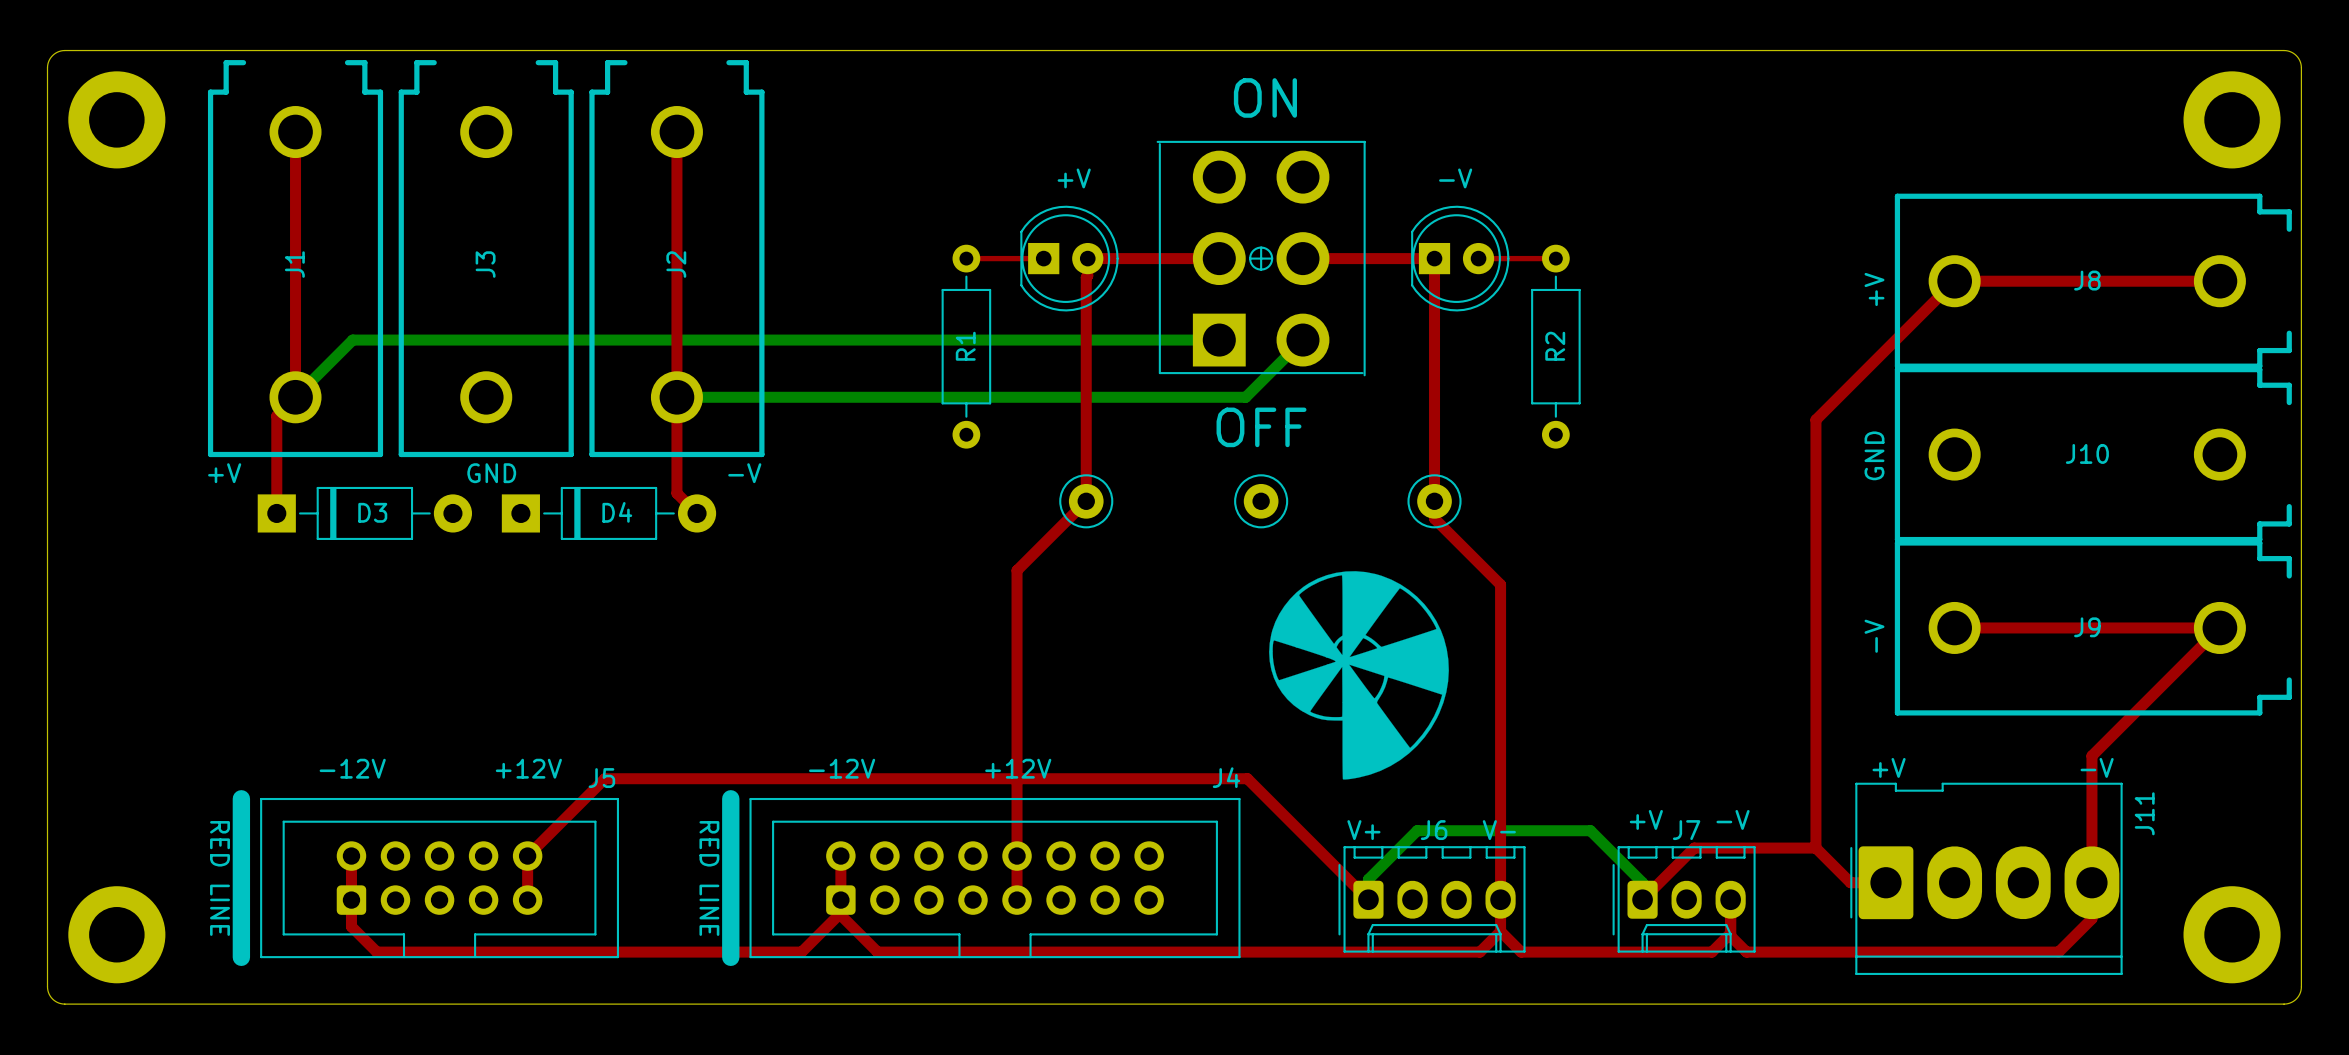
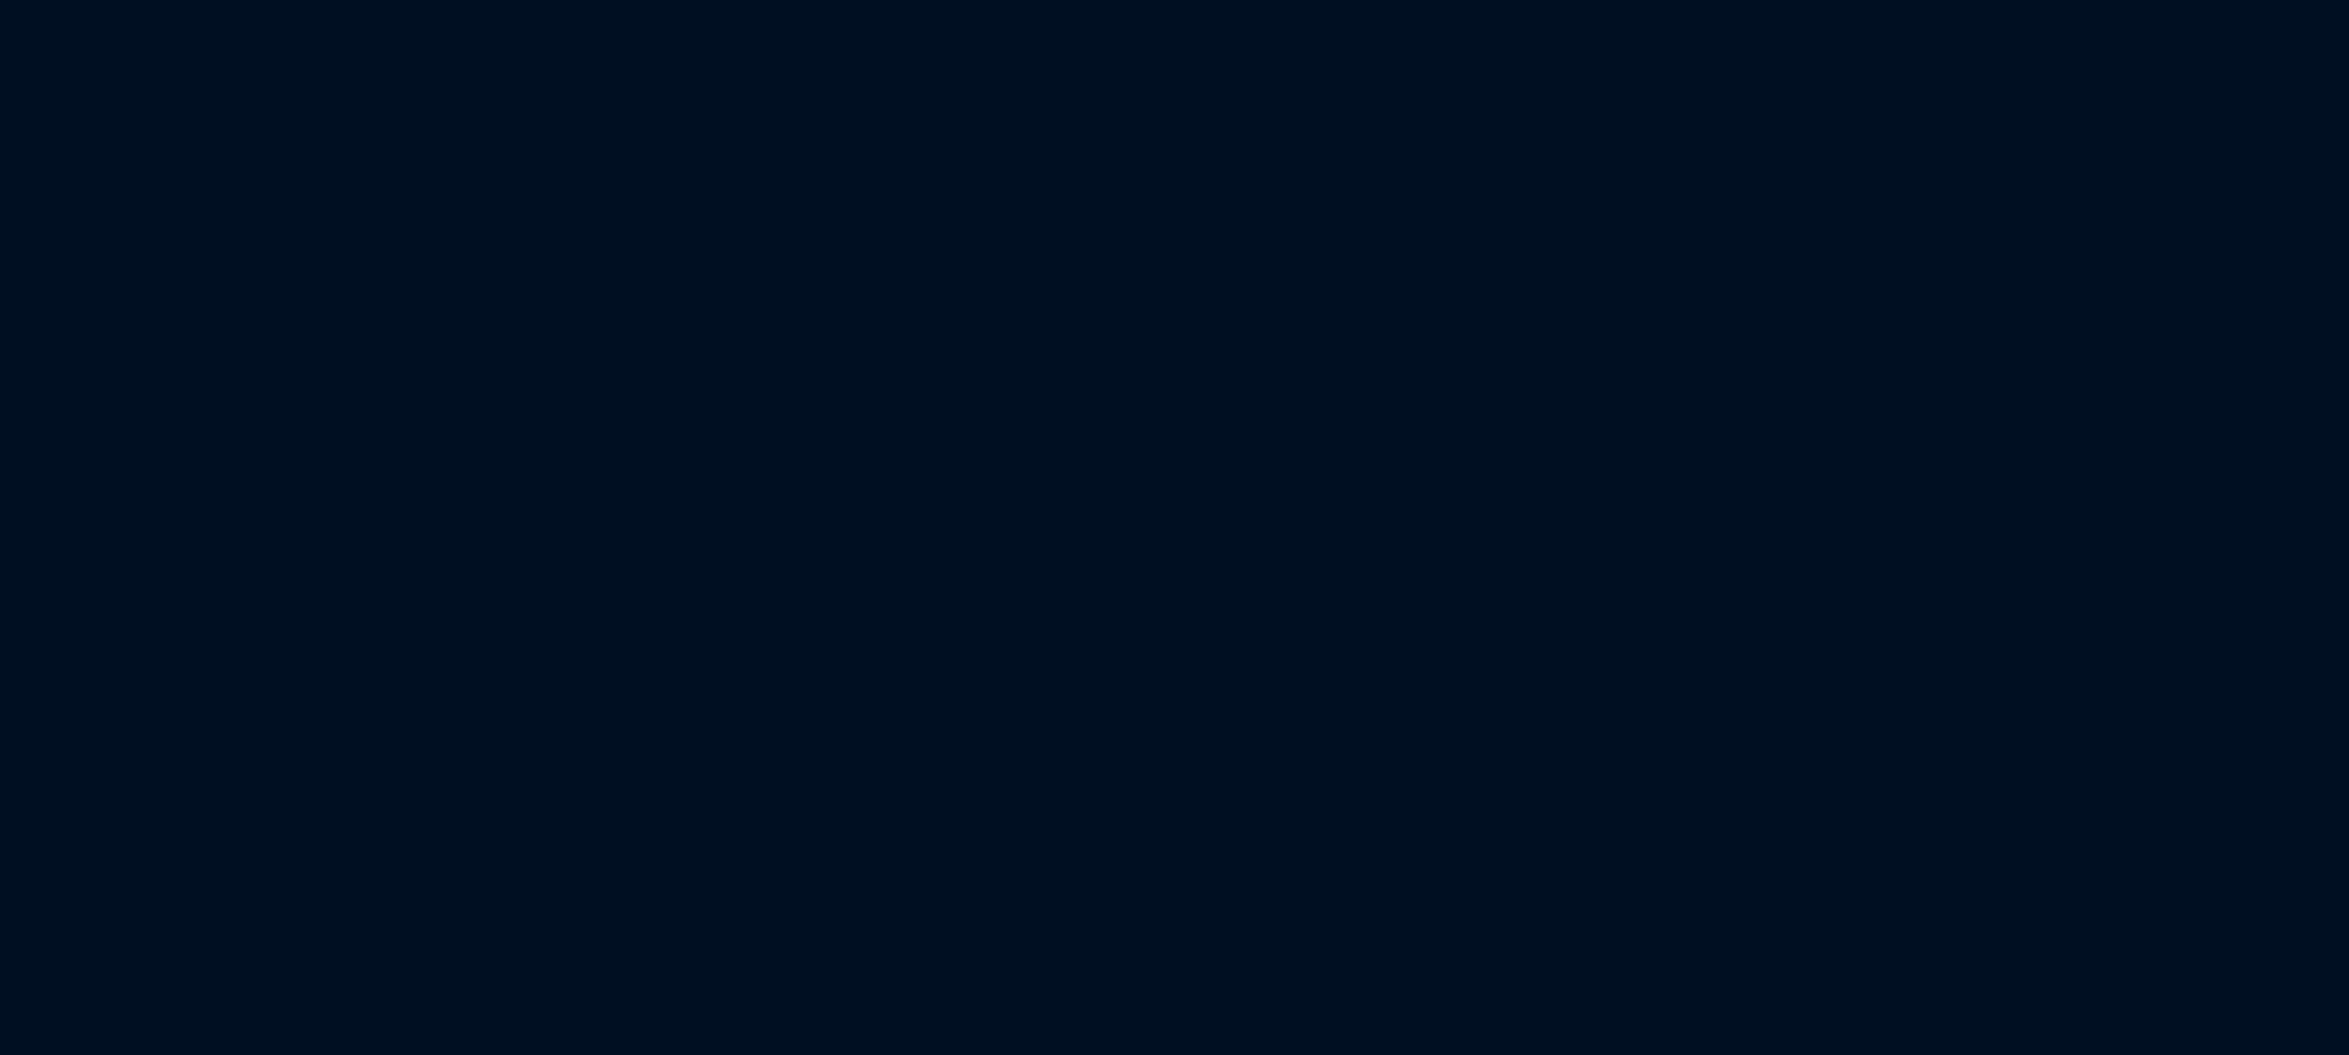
board edge: (64, 50) (2284, 50) (2291, 52) (2298, 58) (2301, 67) (2301, 986) (2299, 994) (2293, 1001) (2284, 1004) (64, 1004) (57, 1002) (50, 995) (47, 986) (47, 67) (52, 55) (64, 50) -> none
text: ON (1265, 97) -> none
part: (116, 119) -> none
part: (2232, 119) -> none
top track: (295, 132) (295, 397) (276, 416) (276, 513) -> none
top track: (676, 132) (676, 493) (697, 513) -> none
text: +V (1074, 178) -> none
text: -V (1455, 178) -> none
J1: (295, 258) -> none
J3: (486, 258) -> none
J2: (676, 258) -> none
top track: (966, 258) (1043, 258) -> none
part: (1069, 258) -> none
top track: (1219, 258) (1087, 258) (1086, 501) (1017, 570) (1017, 900) -> none
part: (1261, 258) -> none
top track: (1302, 258) (1434, 258) (1434, 518) (1500, 584) (1500, 931) -> none
part: (1460, 258) -> none
top track: (1478, 258) (1555, 258) -> none
J8: (2093, 281) -> none
top track: (2219, 281) (1954, 281) (1815, 419) (1815, 848) -> none
text: +V (1874, 289) -> none
bottom track: (1219, 340) (352, 340) (295, 397) -> none
bottom track: (1302, 340) (1245, 397) (676, 397) -> none
R1: (966, 346) -> none
R2: (1555, 346) -> none
text: OFF (1261, 427) -> none
J10: (2093, 454) -> none
text: GND (1874, 455) -> none
text: +V (224, 473) -> none
text: GND (491, 473) -> none
text: -V (744, 473) -> none
part: (1086, 501) -> none
part: (1261, 501) -> none
part: (1434, 501) -> none
D3: (364, 513) -> none
D4: (608, 513) -> none
drawing: [1269, 571, 1449, 780] -> none
top track: (1954, 627) (2219, 627) (2091, 755) (2091, 918) (2058, 952) (1746, 952) (1730, 936) (1730, 899) -> none
J9: (2093, 627) -> none
text: -V (1874, 636) -> none
text: +V (1889, 767) -> none
text: -V (2097, 767) -> none
text: +V (1646, 819) -> none
text: -V (1733, 819) -> none
top track: (1815, 848) (1694, 848) (1642, 899) -> none
top track: (1815, 848) (1850, 882) (1885, 882) -> none
top track: (351, 856) (351, 926) (376, 952) (801, 952) (840, 912) -> none
top track: (840, 856) (840, 915) (877, 952) (1479, 952) (1500, 931) -> none
J5: (425, 878) -> none
J4: (981, 878) -> none
J11: (1986, 878) -> none
top track: (1368, 899) (1247, 778) (604, 778) (527, 856) (527, 900) -> none
bottom track: (1368, 899) (1368, 879) (1417, 830) (1590, 830) (1642, 882) (1642, 899) -> none
J6: (1432, 899) -> none
J7: (1684, 899) -> none
top track: (1500, 931) (1521, 952) (1711, 952) (1730, 933) -> none
part: (116, 934) -> none
part: (2232, 934) -> none

